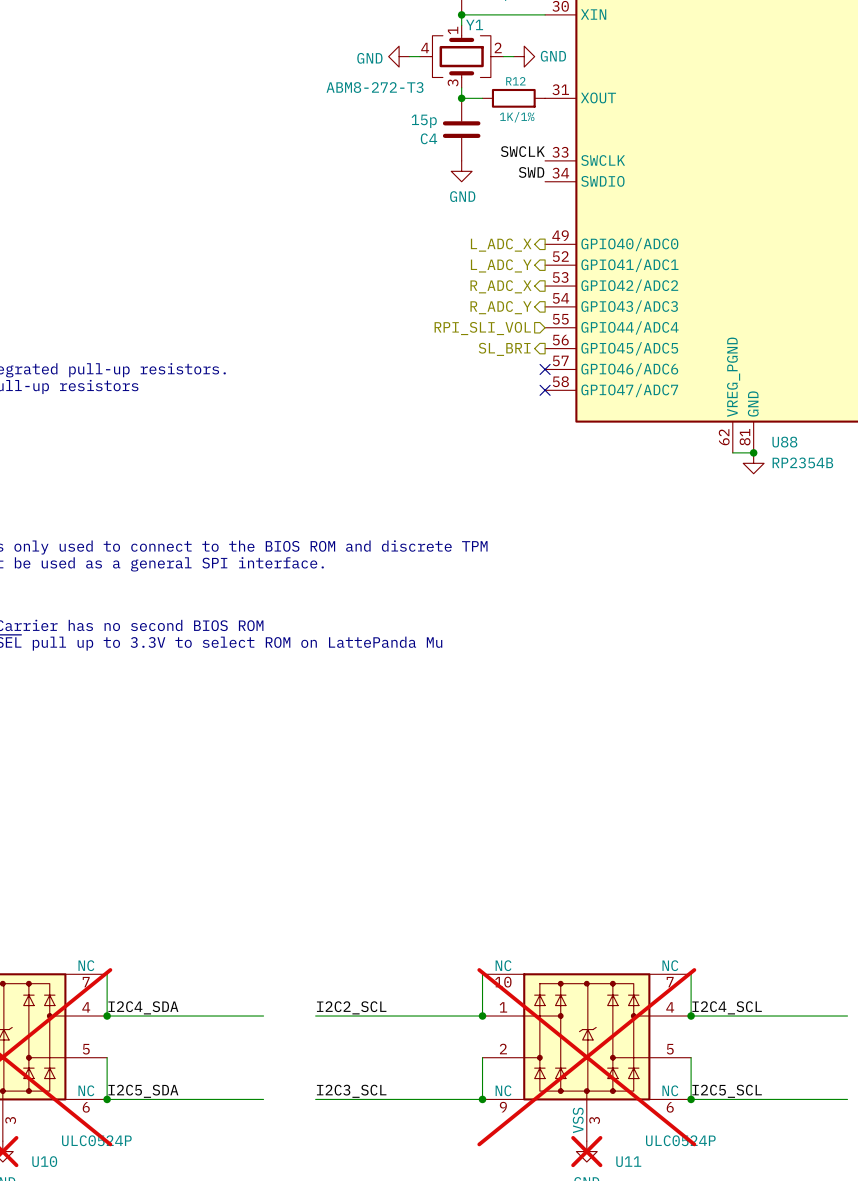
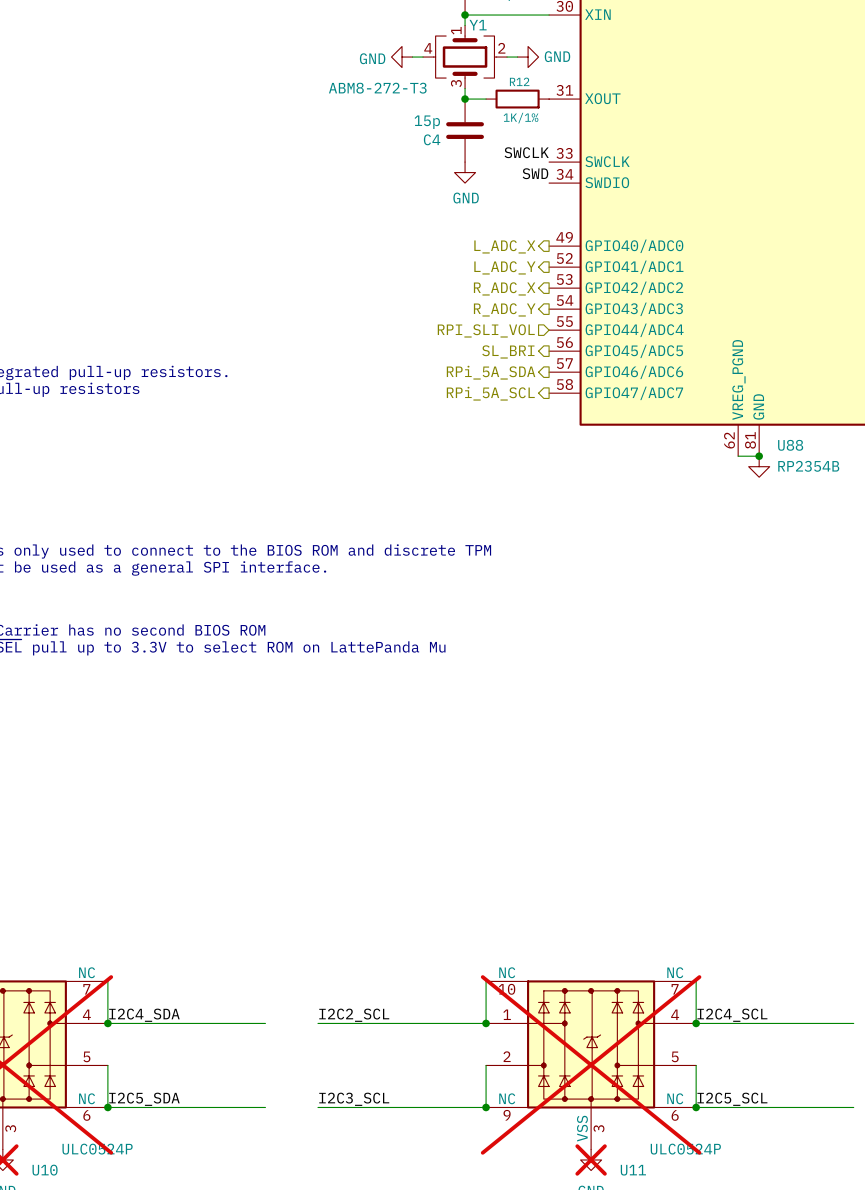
hierarchical label: none -> RPi_5A_SDA (491, 372)
no-connect mark: (545, 369) -> none
hierarchical label: none -> RPi_5A_SCL (490, 393)
no-connect mark: (545, 390) -> none

